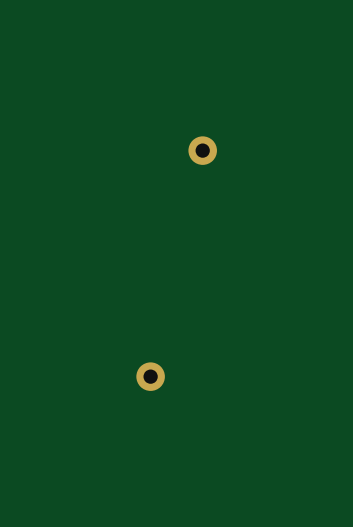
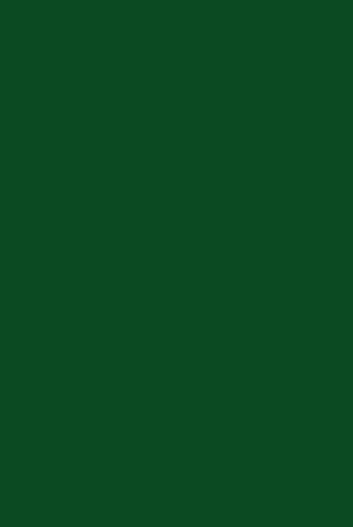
via: (202, 150) -> none
via: (150, 376) -> none

